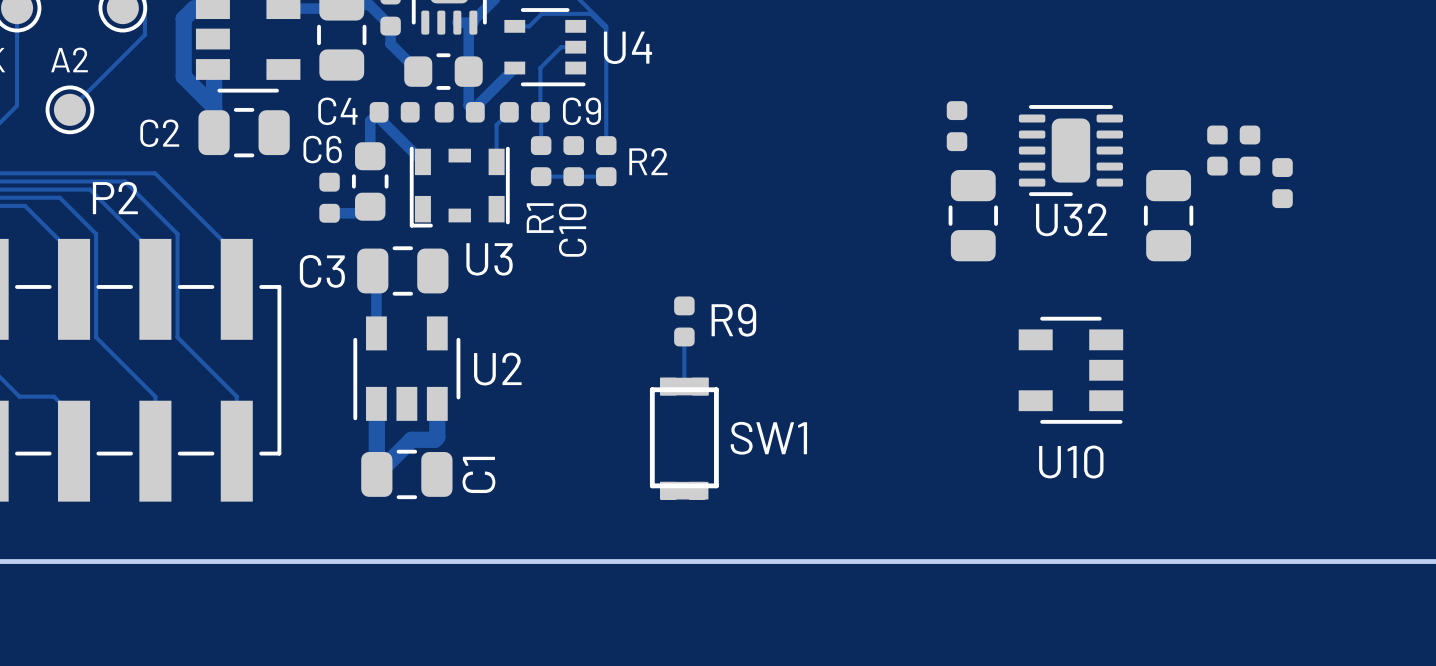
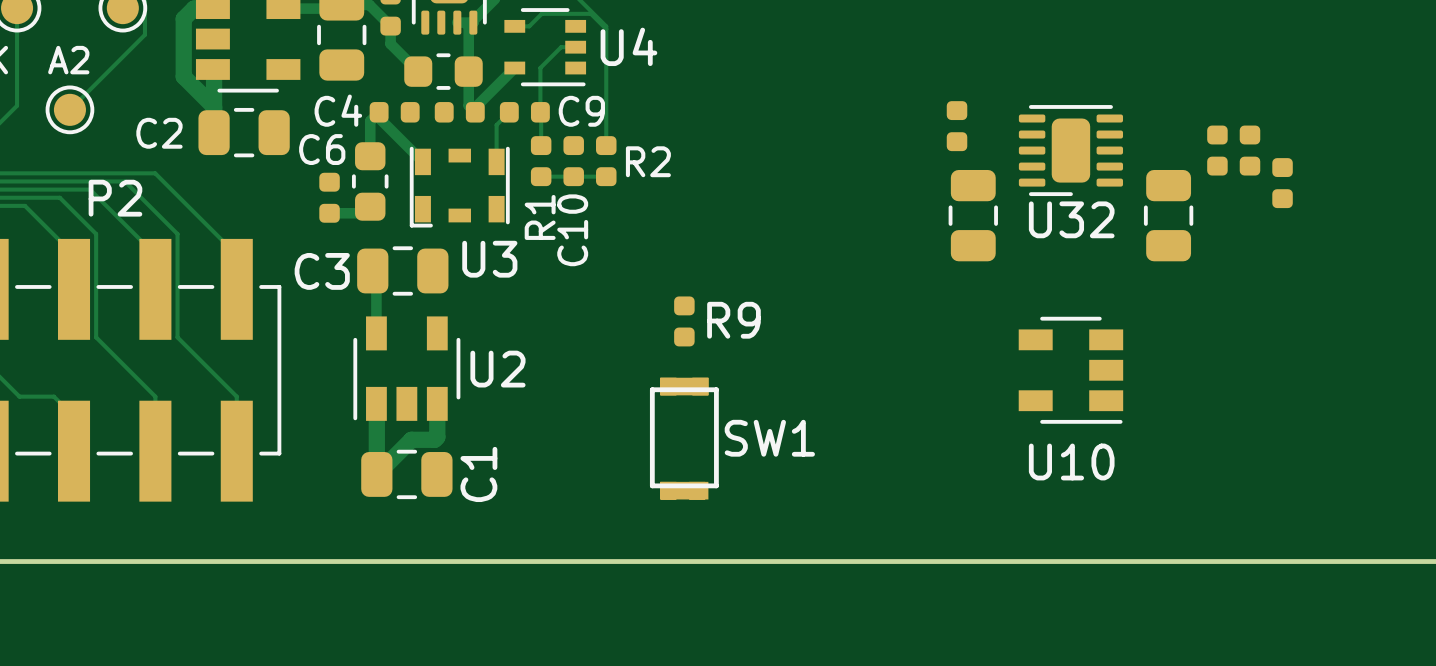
track: (684, 336) (684, 386) -> none

